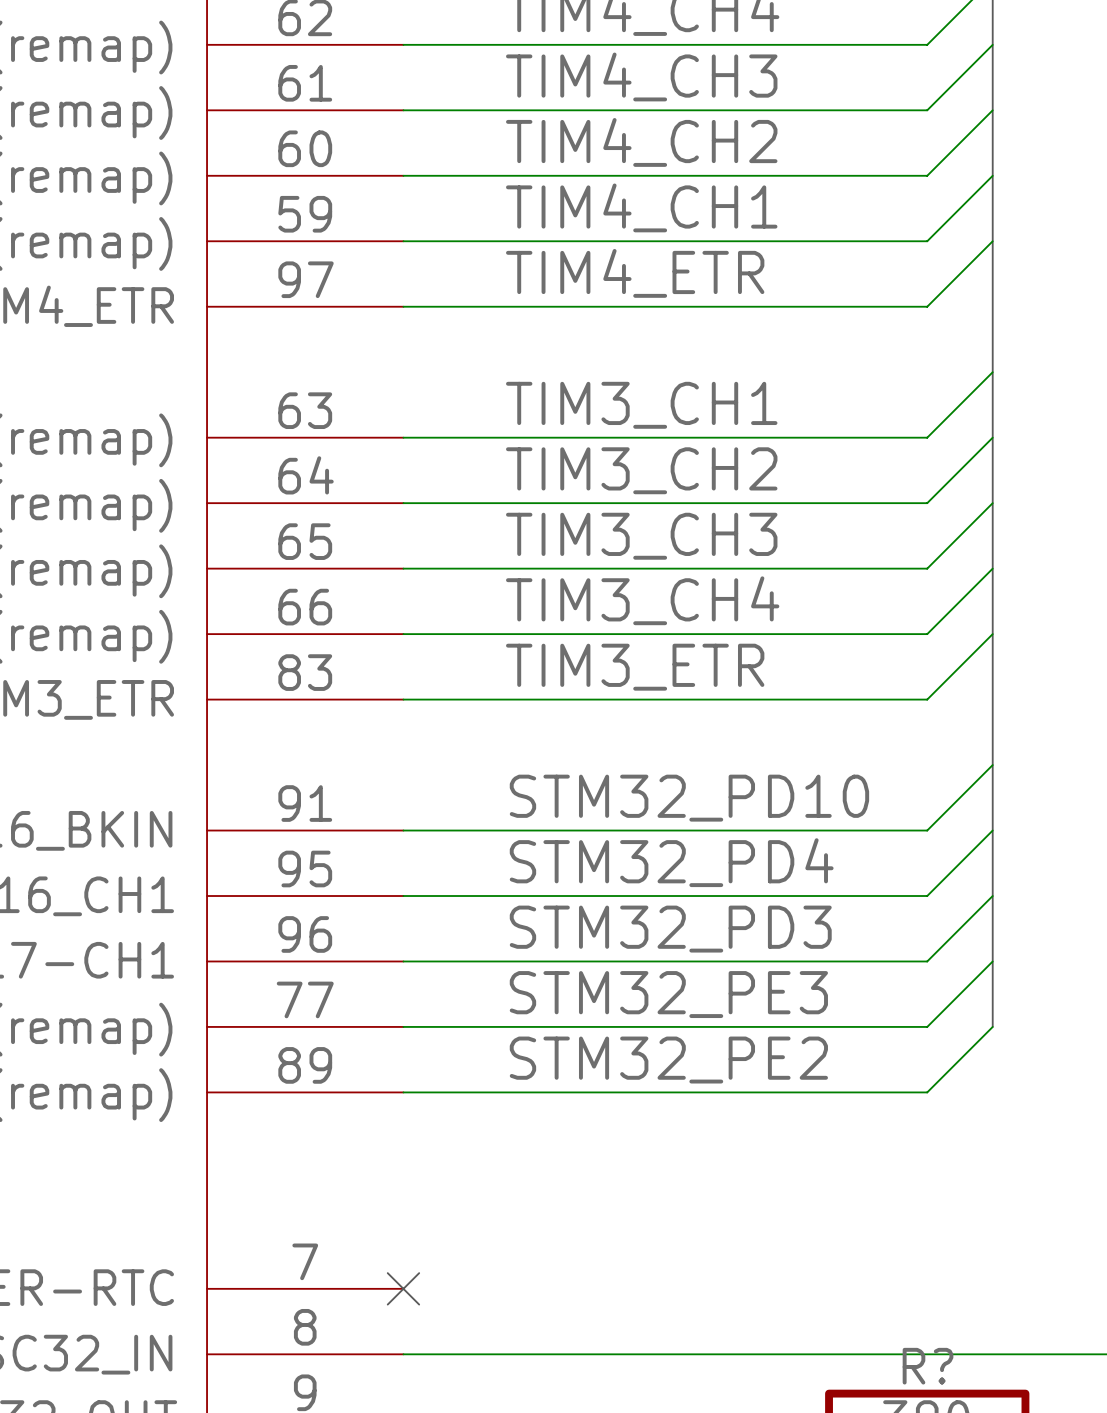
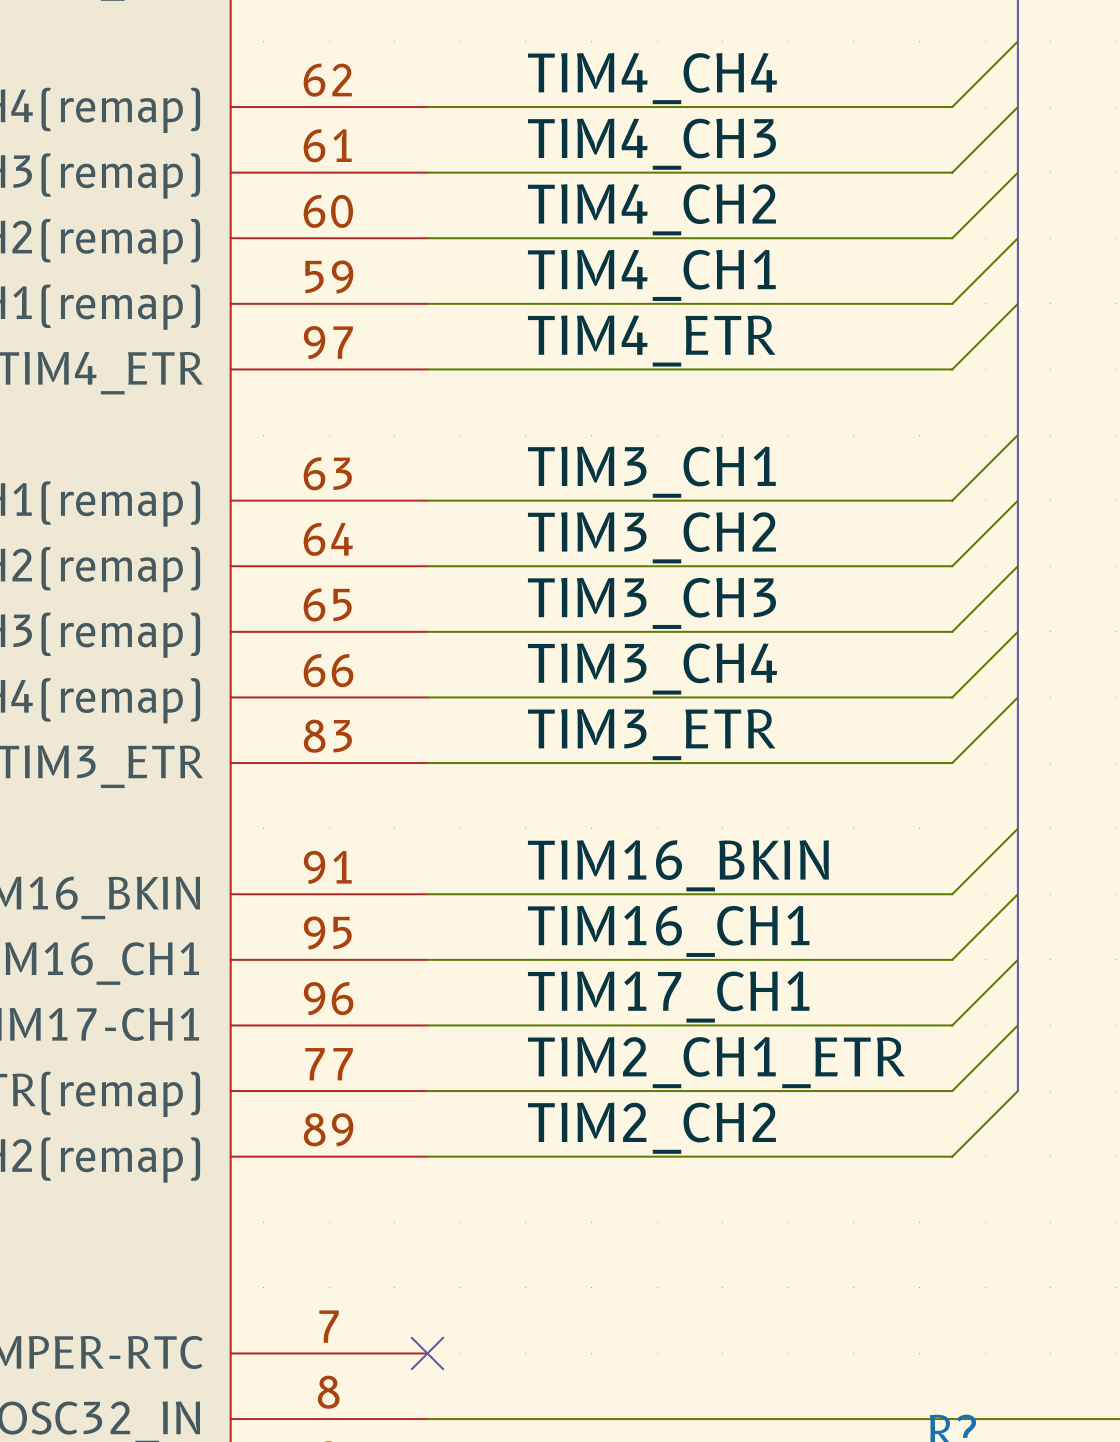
label: STM32_PD10 (689, 798) -> TIM16_BKIN (678, 865)
label: STM32_PD4 (671, 862) -> TIM16_CH1 (668, 931)
label: STM32_PD3 (670, 929) -> TIM17_CH1 (668, 997)
label: STM32_PE3 (668, 994) -> TIM2_CH1_ETR (716, 1062)
label: STM32_PE2 (668, 1060) -> TIM2_CH2 (651, 1128)

